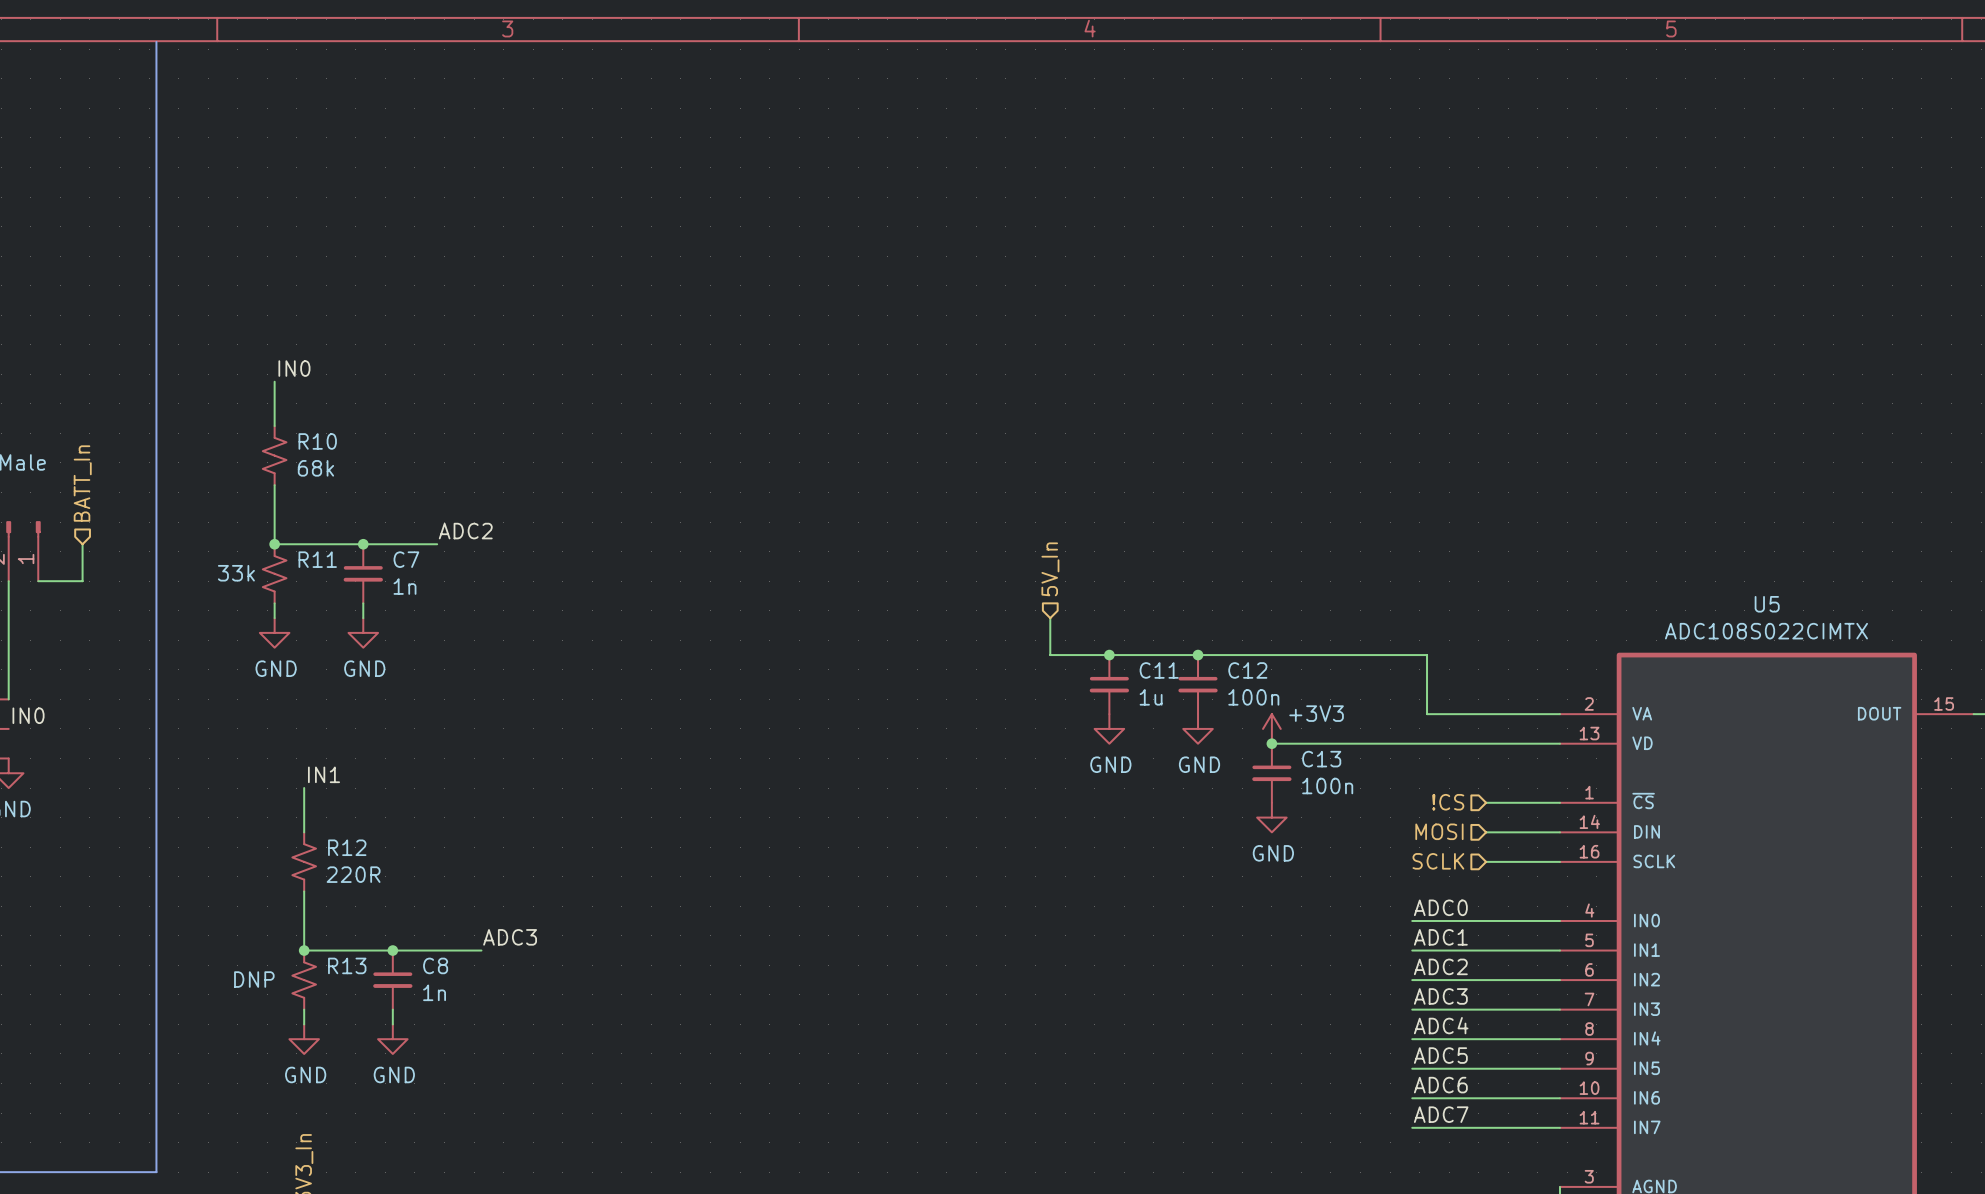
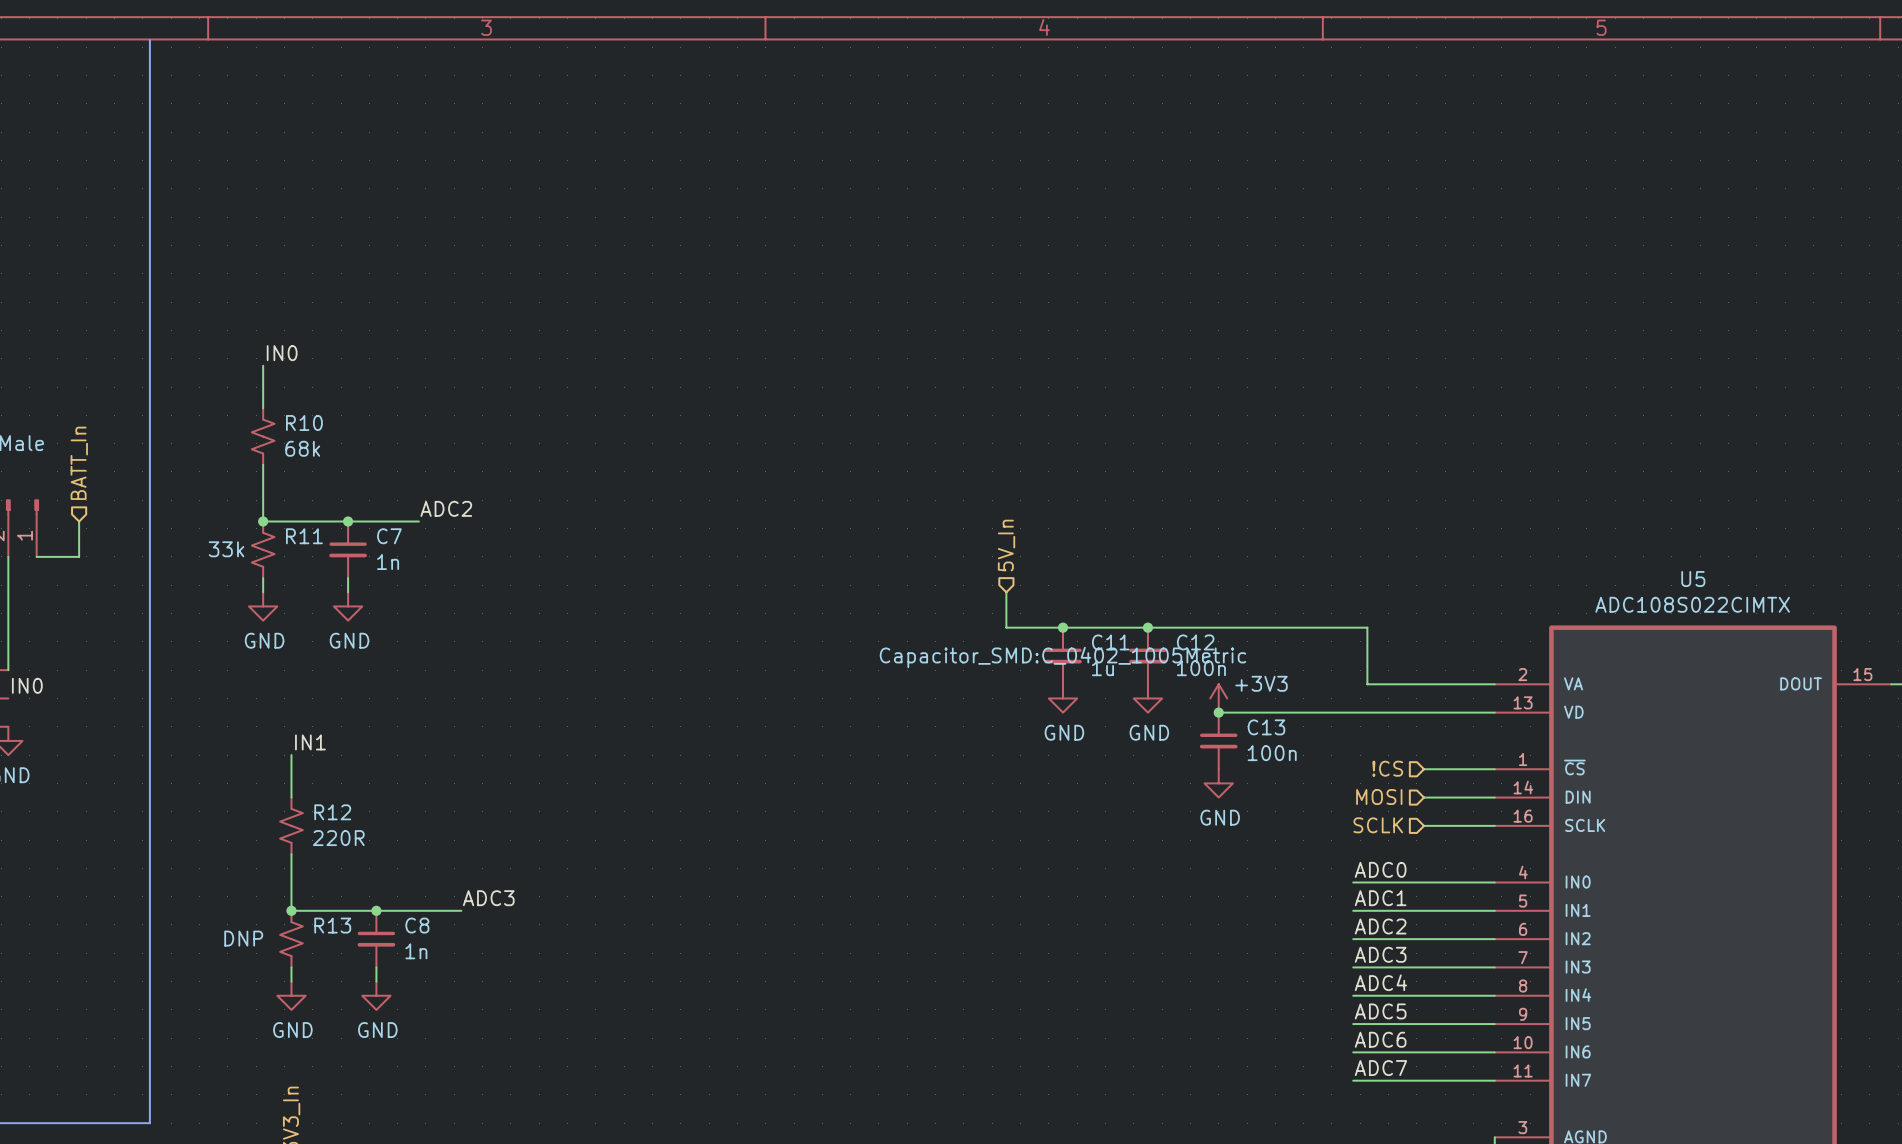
C11 text: none -> Capacitor_SMD:C_0402_1005Metric (1063, 657)

